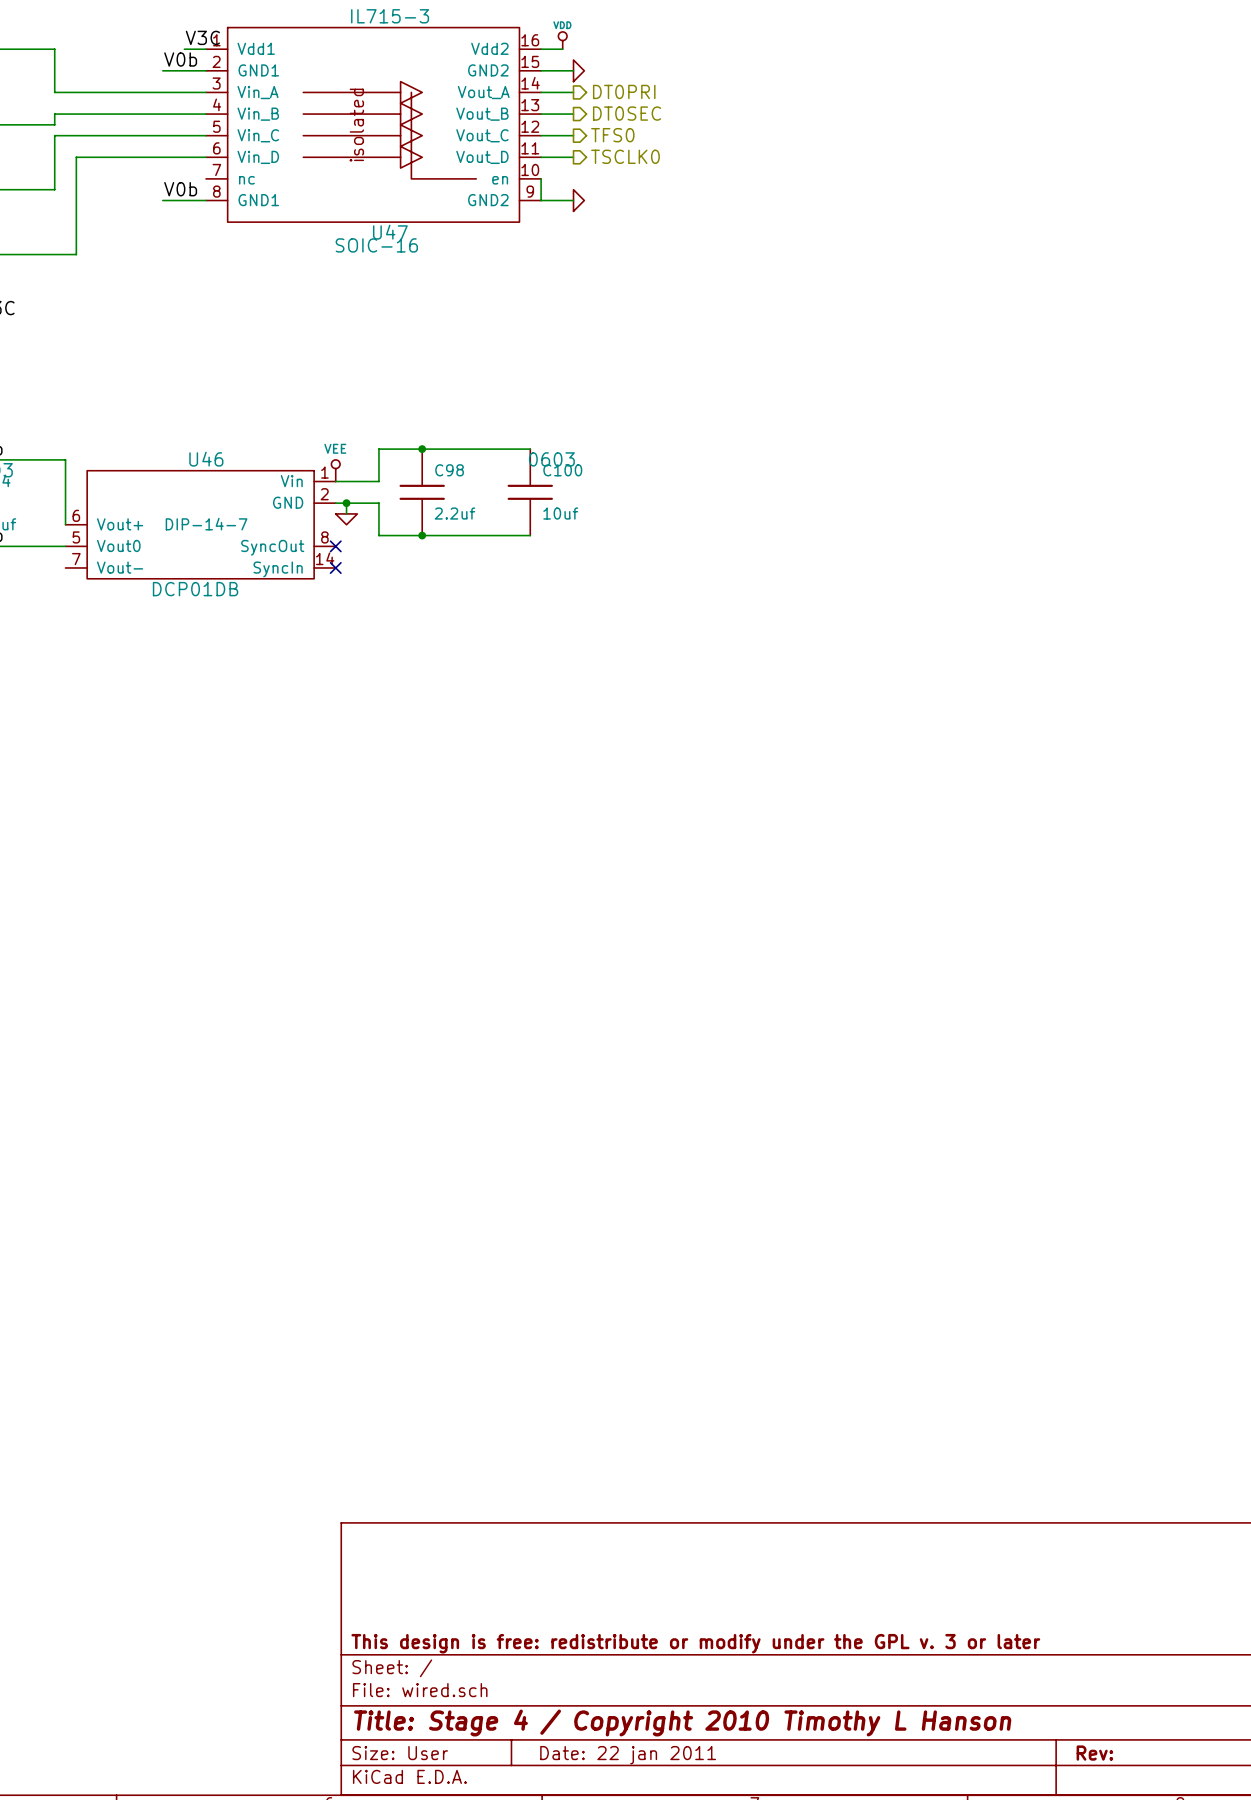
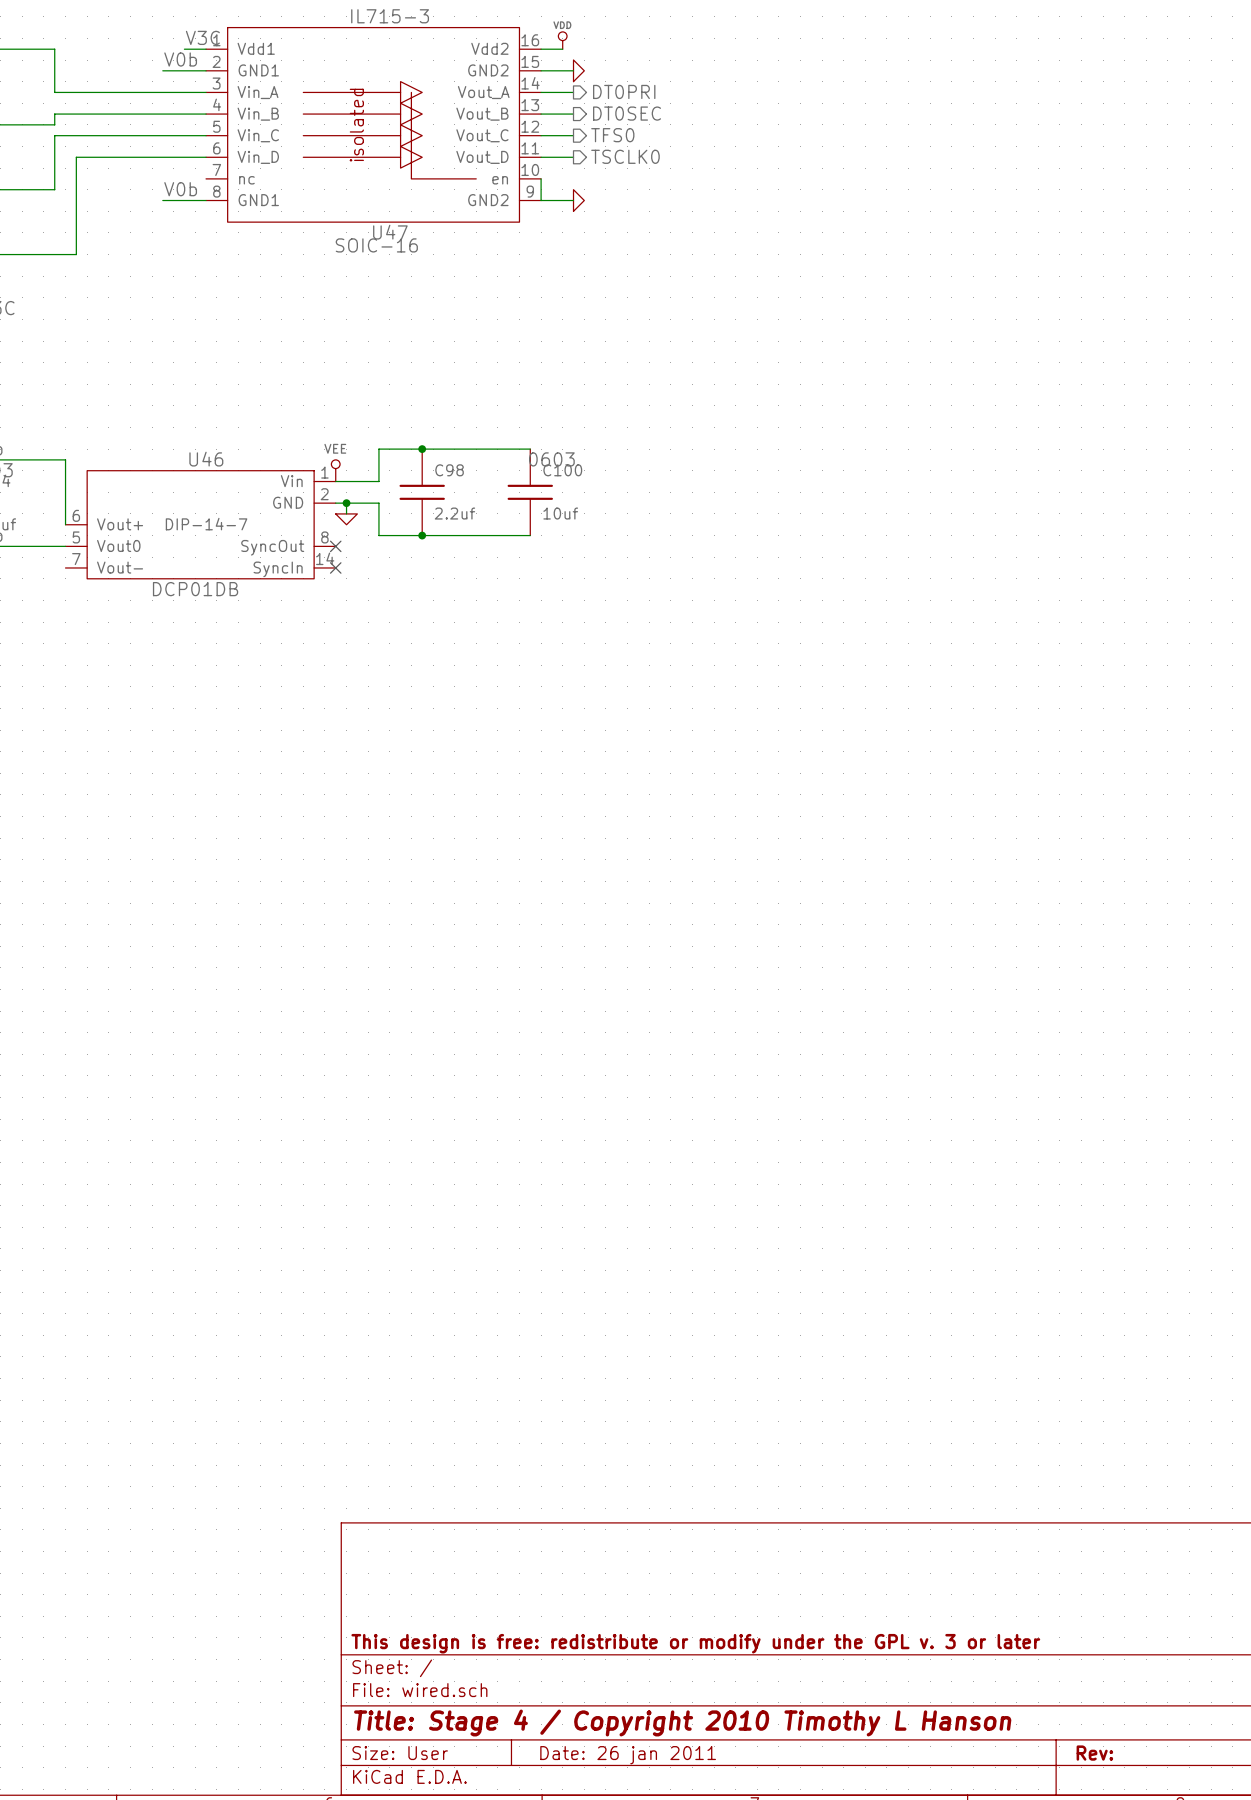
title block: Date: 22 jan 2011 (628, 1755) -> Date: 26 jan 2011 (628, 1755)

